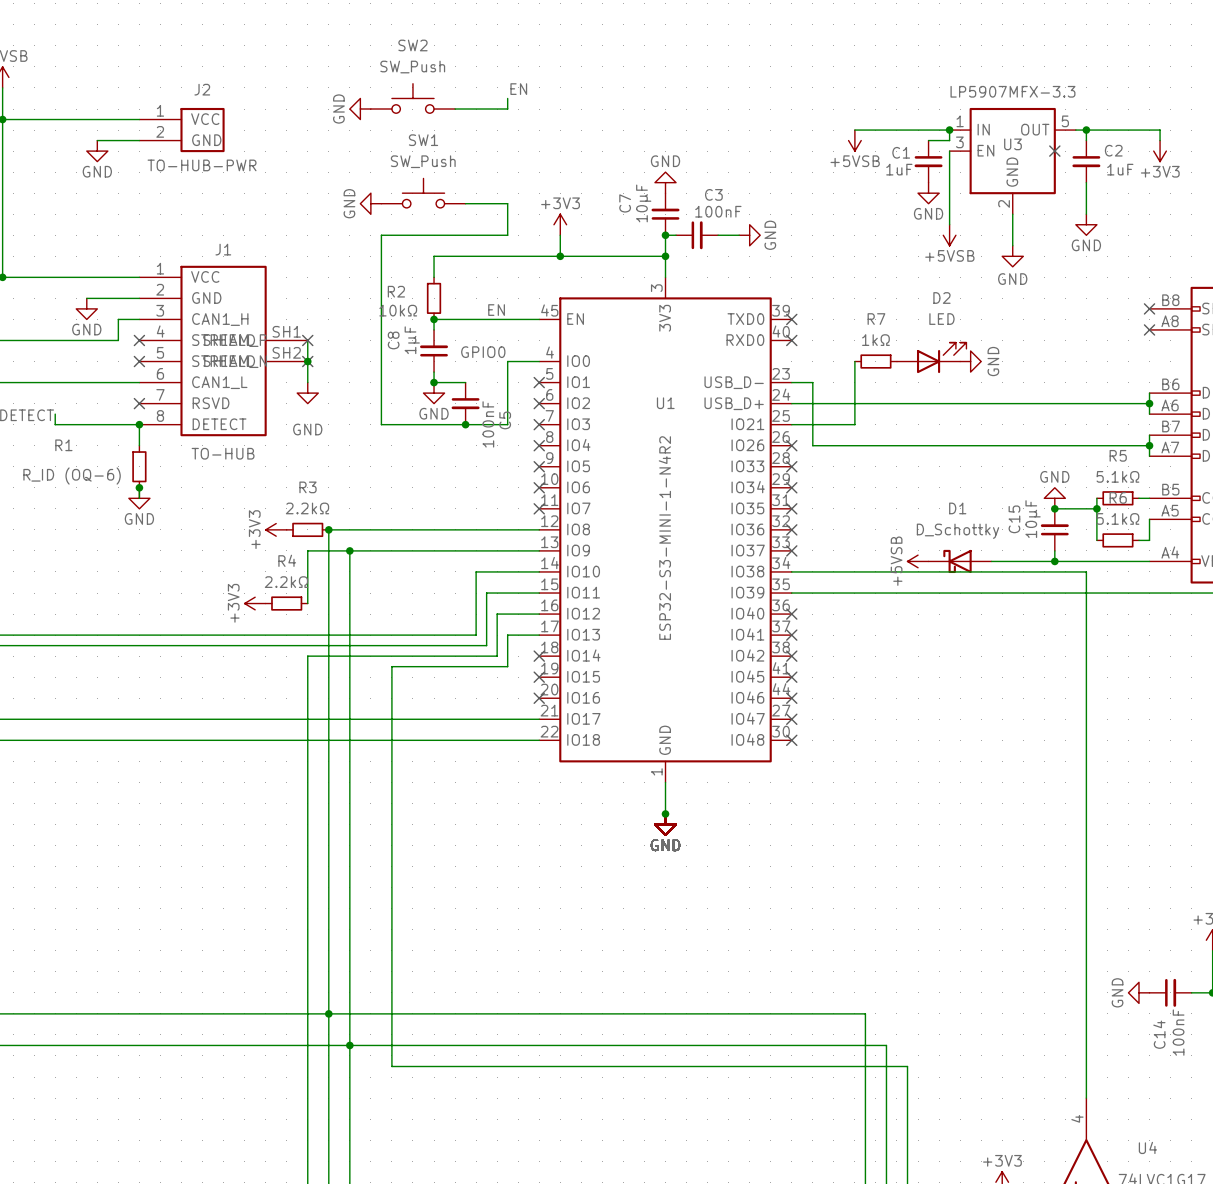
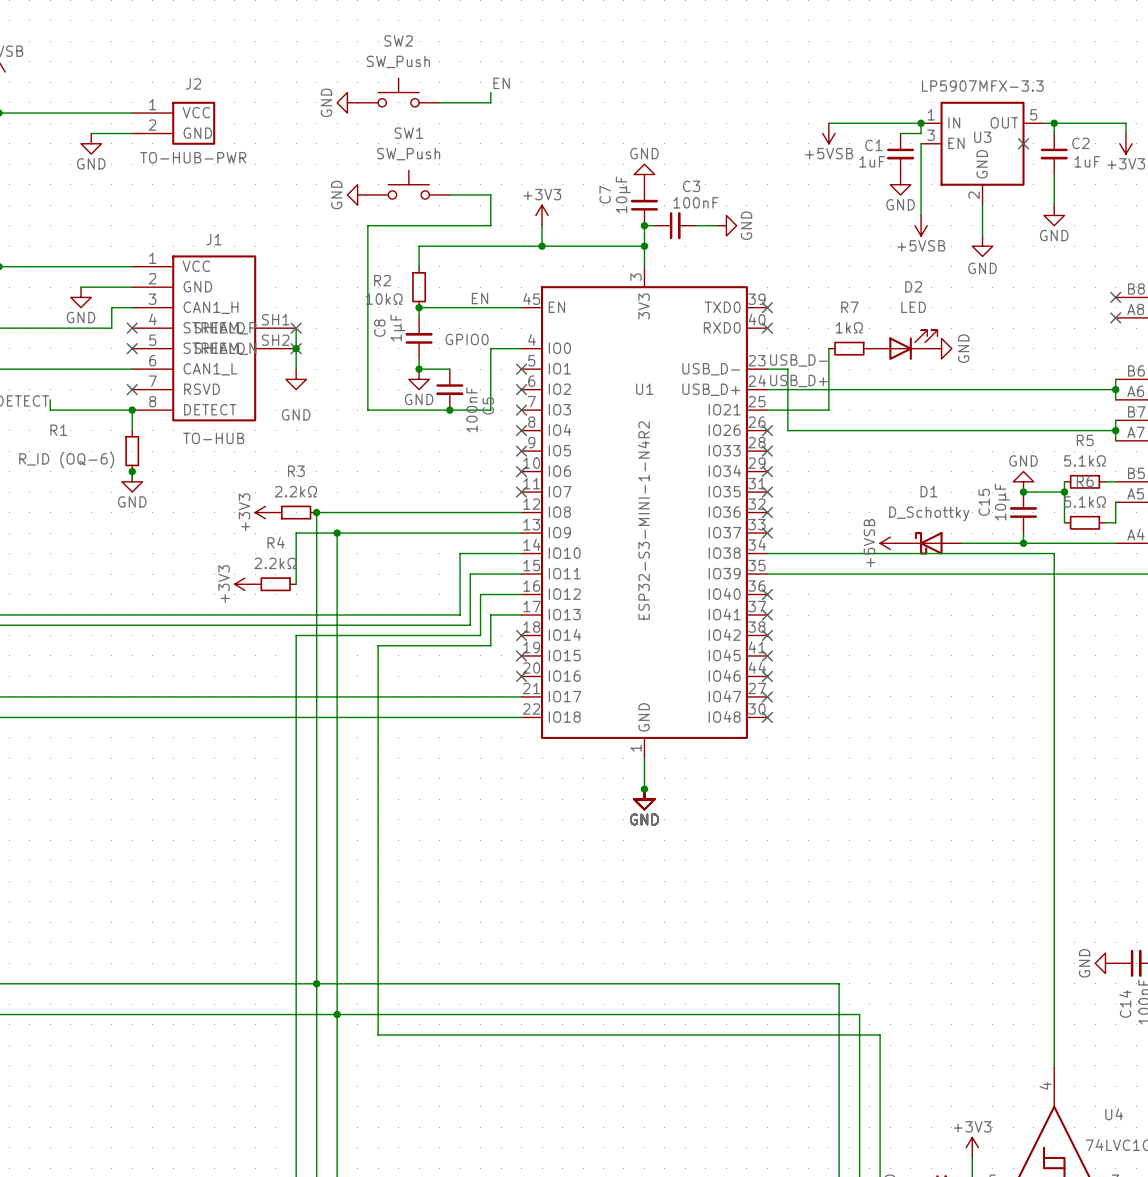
label: none -> USB_D- (798, 360)
label: none -> USB_D+ (798, 380)

